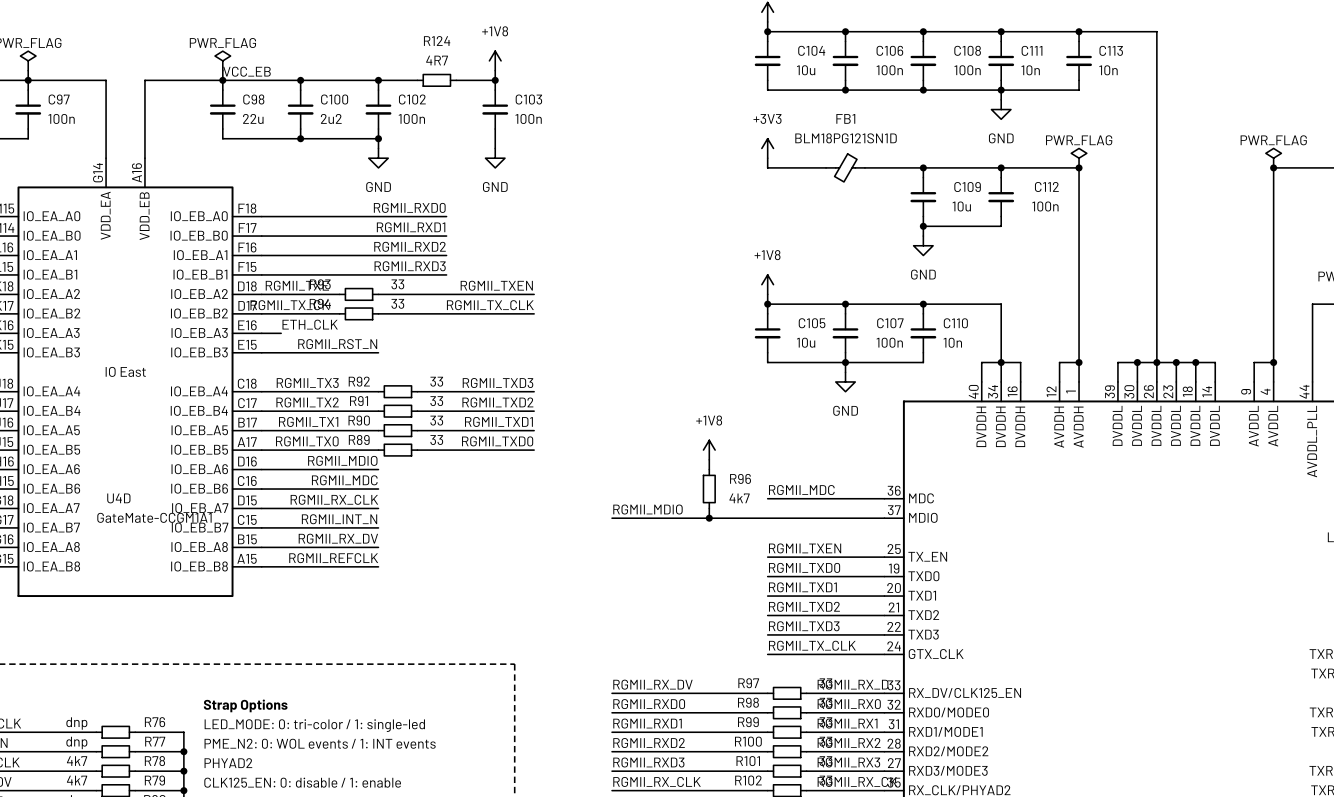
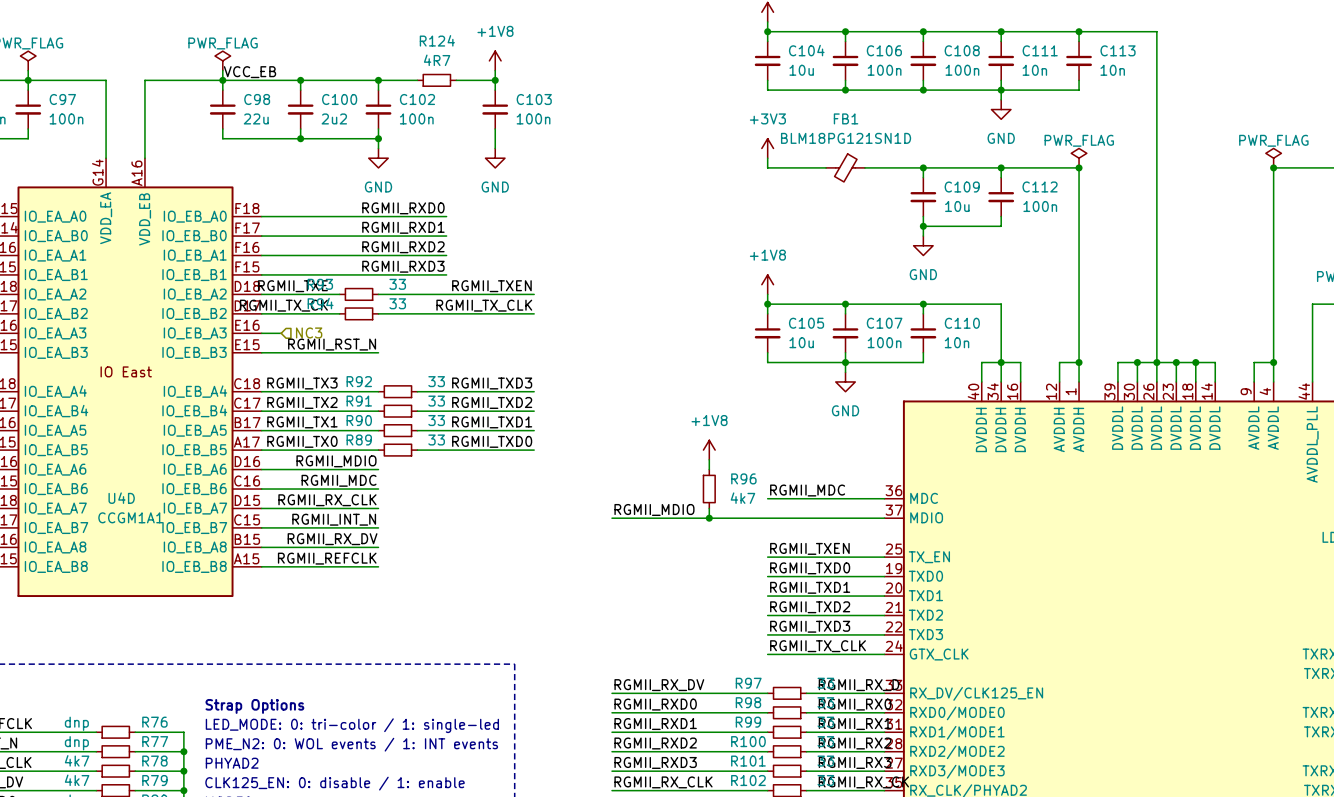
label: ETH_CLK (310, 324) -> none
hierarchical label: none -> NC3 (309, 332)
U4D value: GateMate-CCGM1A1 (154, 517) -> CCGM1A1 (130, 517)

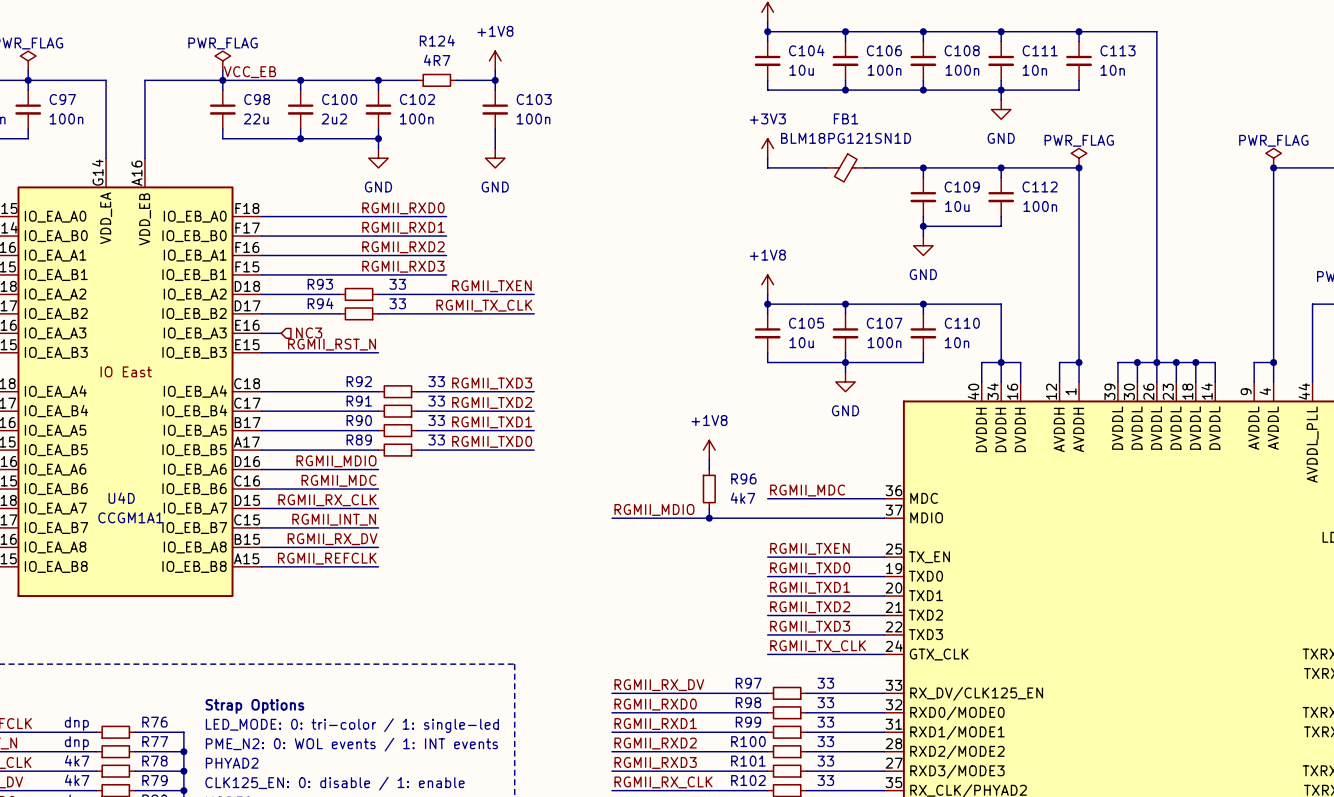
label: RGMII_TXE (292, 286) -> none
label: RGMII_TX_CK (283, 305) -> none
label: RGMII_TX3 (302, 383) -> none
label: RGMII_TX2 (302, 402) -> none
label: RGMII_TX1 (302, 422) -> none
label: RGMII_TX0 (302, 441) -> none
label: RGMII_RX_D (859, 685) -> none
label: RGMII_RX0 (855, 704) -> none
label: RGMII_RX1 (855, 724) -> none
label: RGMII_RX2 (855, 743) -> none
label: RGMII_RX3 (855, 762) -> none
label: RGMII_RX_CK (863, 782) -> none

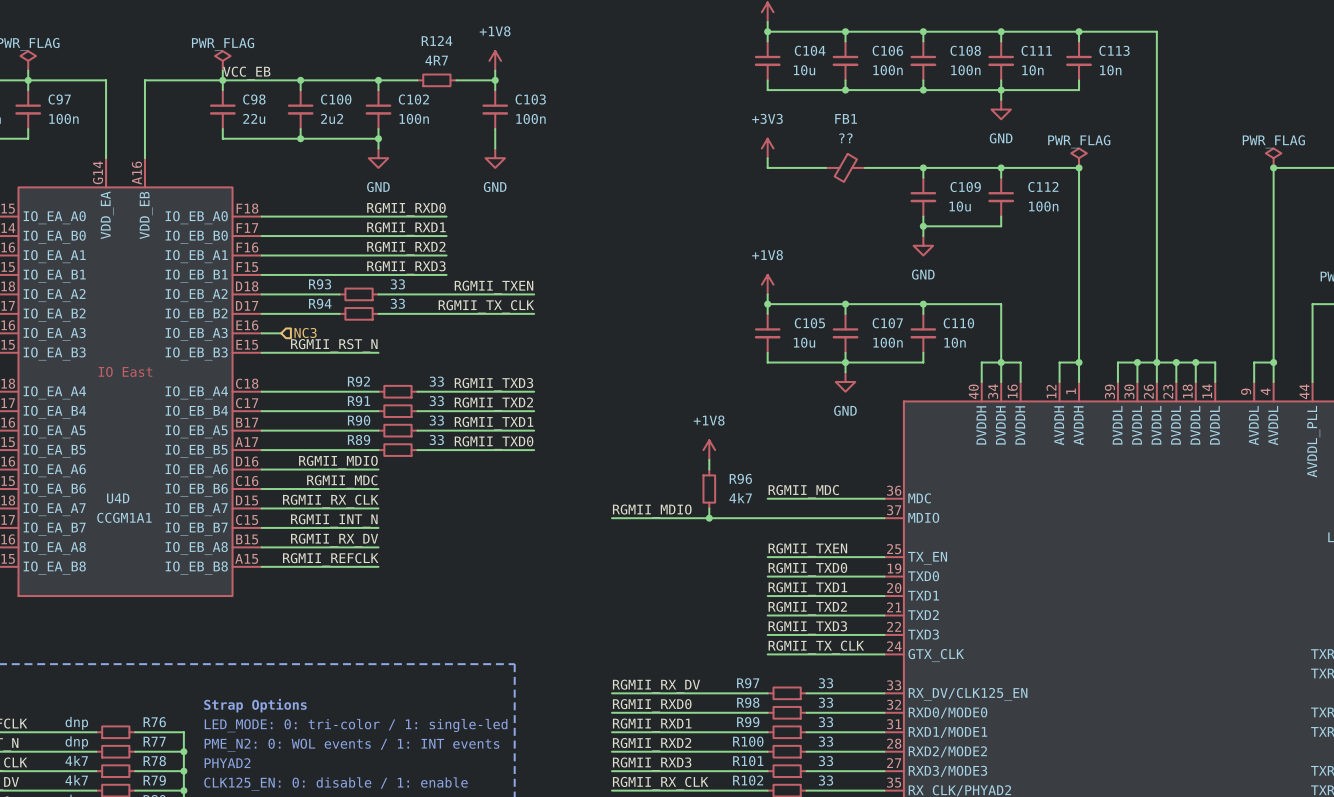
FB1 value: BLM18PG121SN1D (846, 138) -> ?? (845, 138)

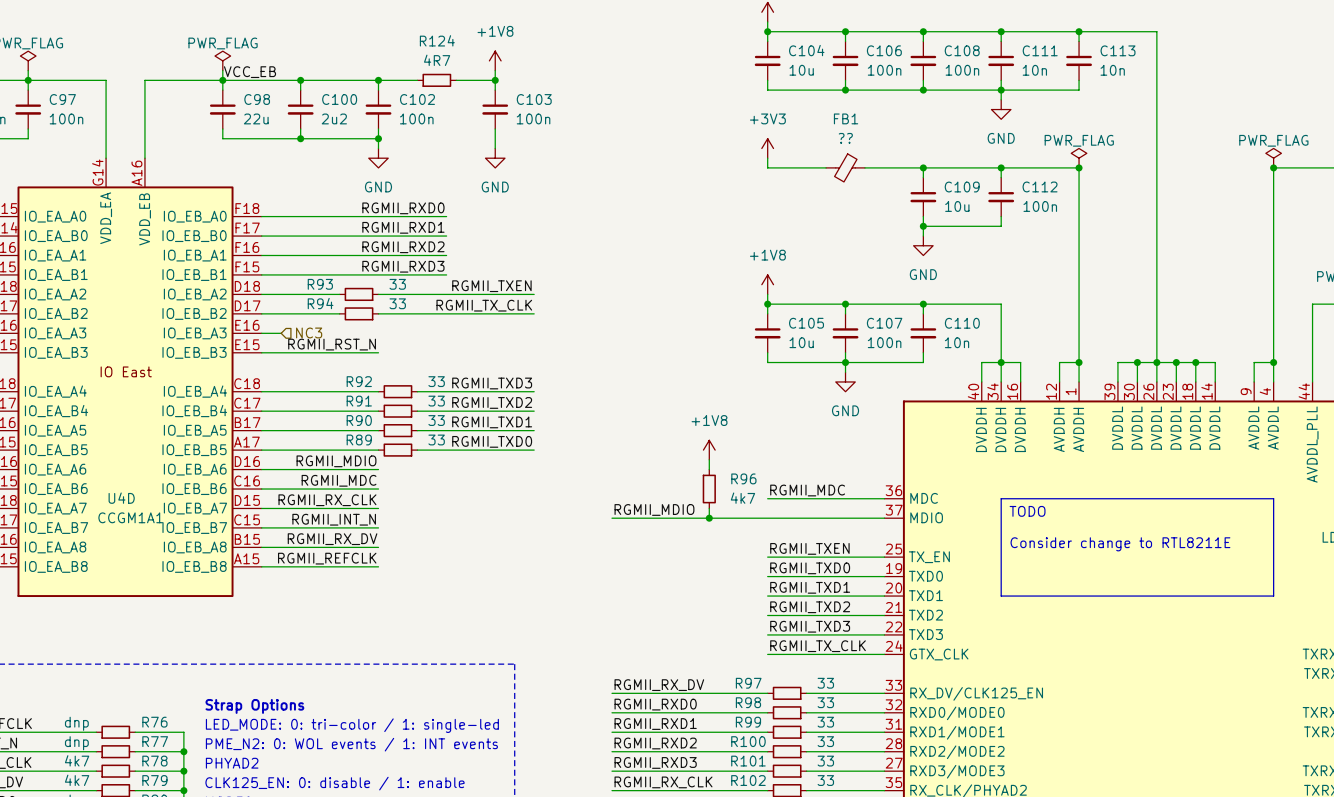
line: none -> (1001, 498) (1273, 498) (1273, 596) (1001, 596) (1001, 498)
text: none -> TODO (1027, 511)
text: none -> Consider change to RTL8211E (1120, 544)

